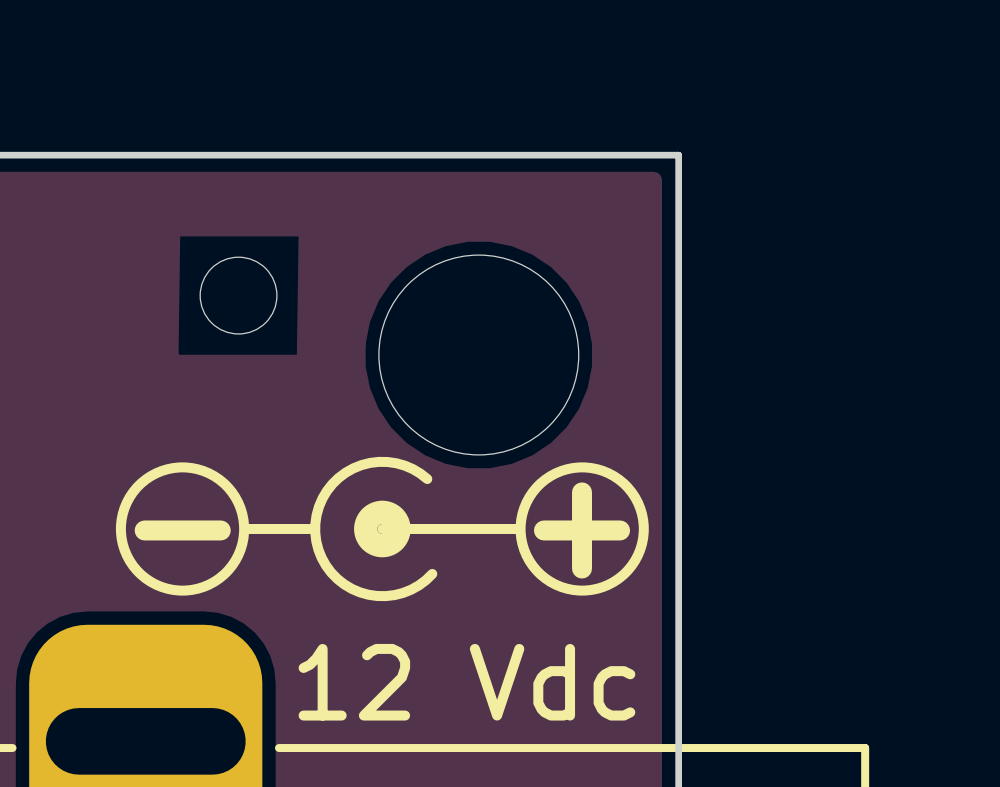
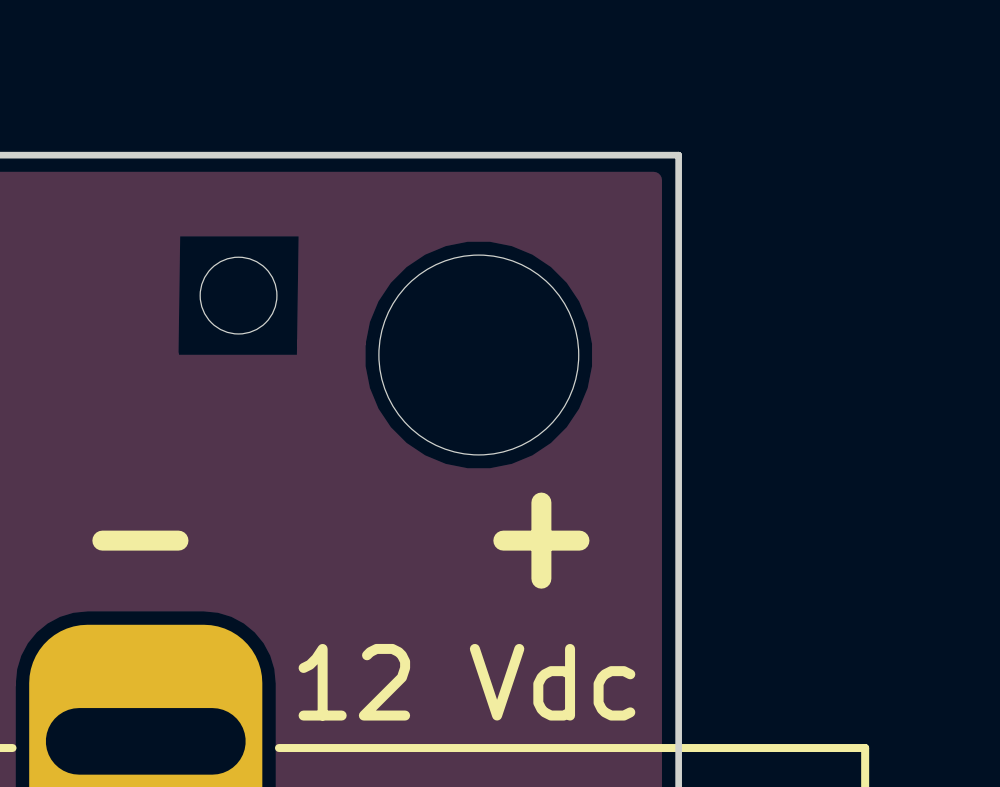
drawing: [115, 456, 649, 602] -> none
text position: - (182, 530) -> - (140, 540)
text position: + (582, 530) -> + (541, 540)

